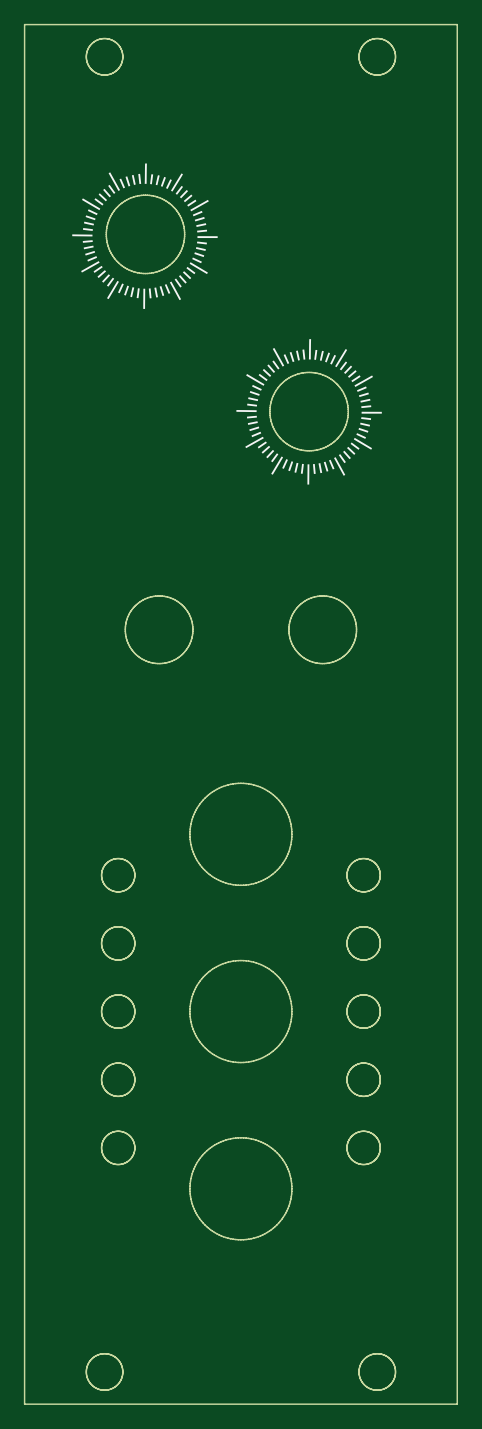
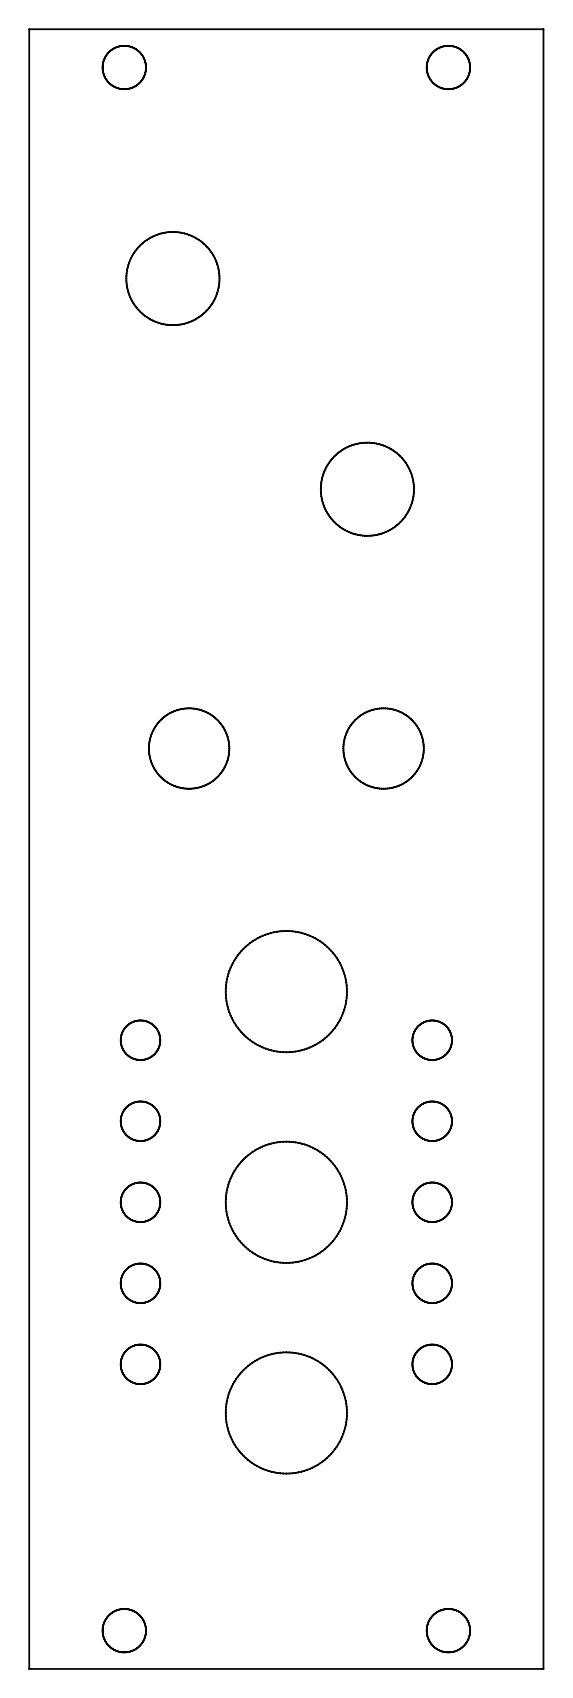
drawing: [72, 163, 218, 309] -> none
drawing: [236, 339, 382, 485] -> none

